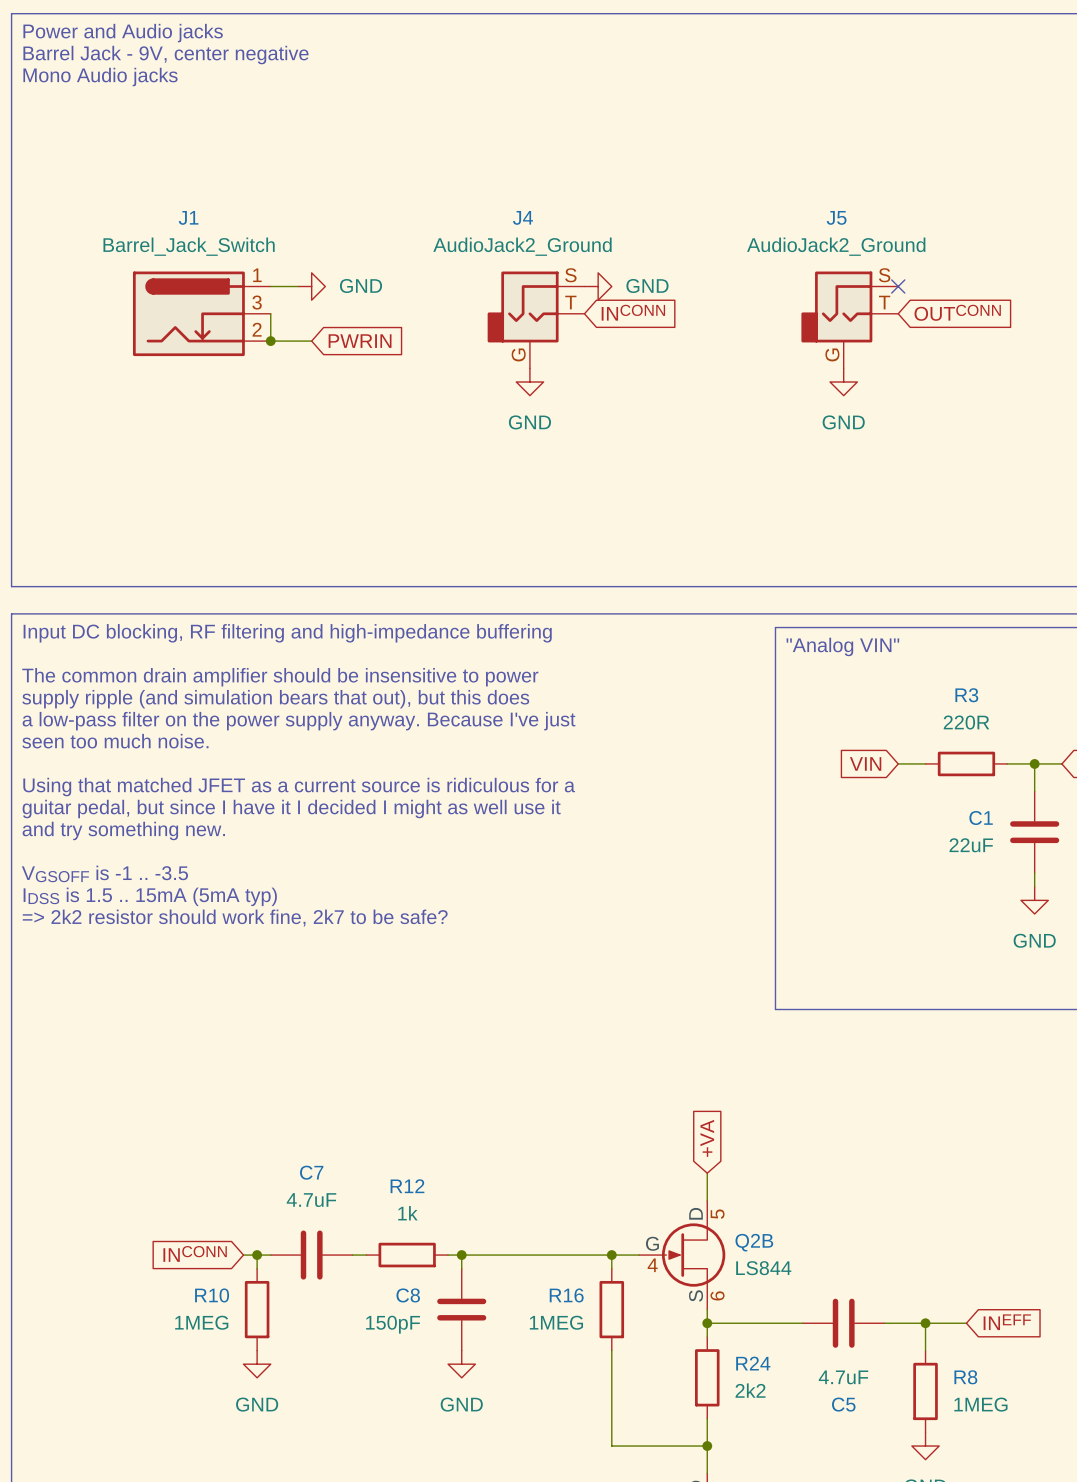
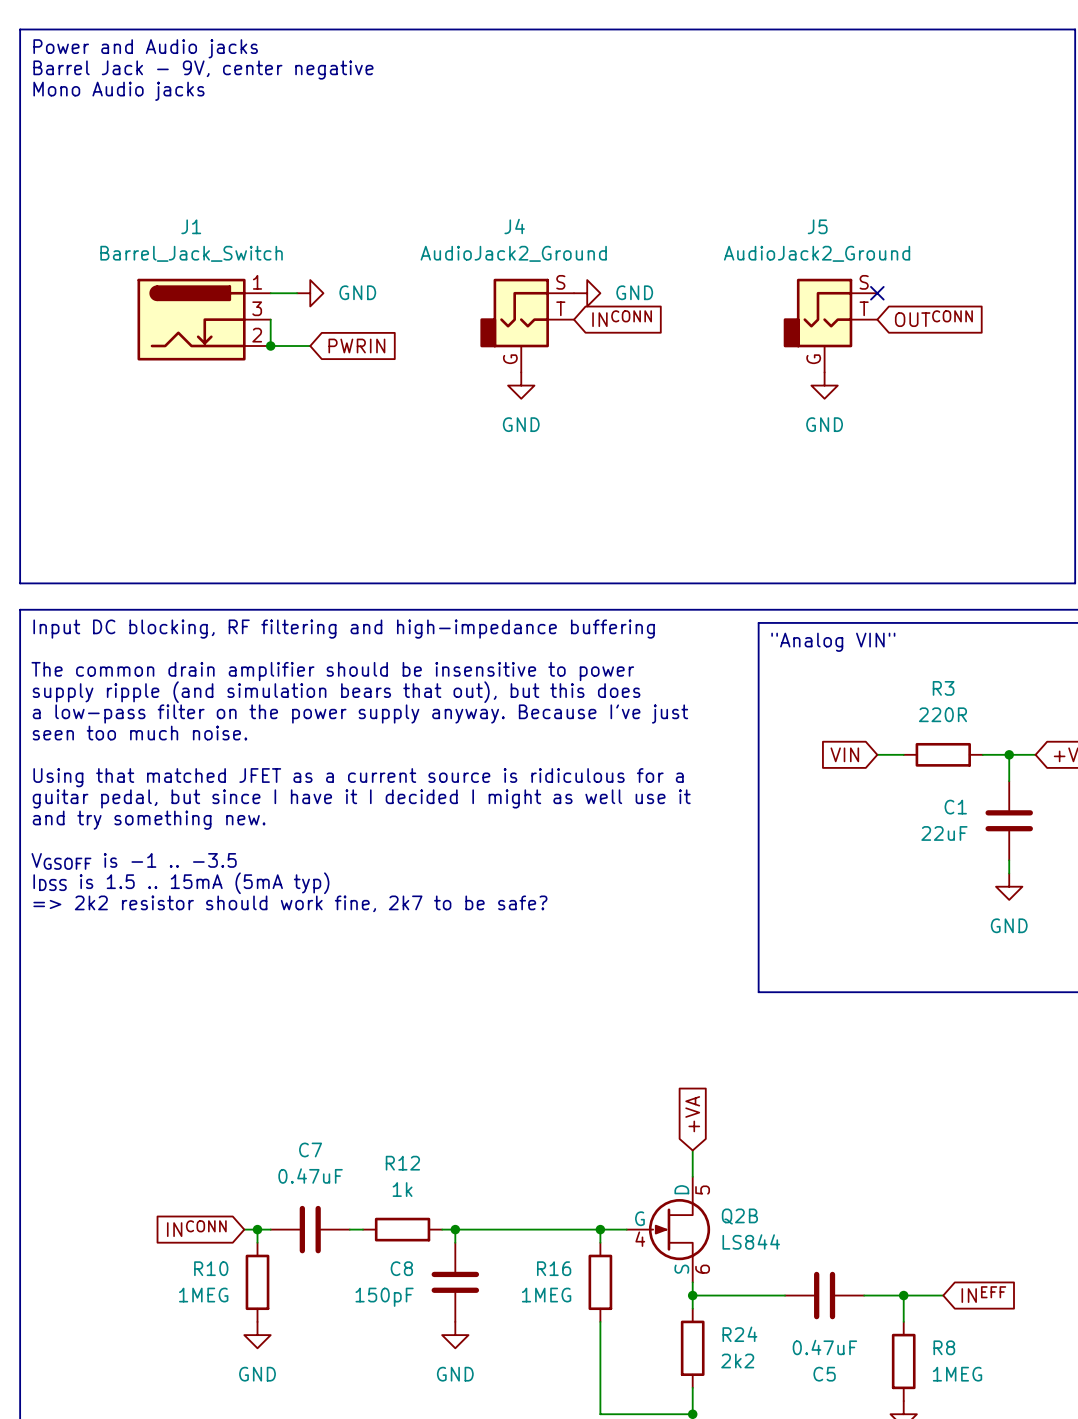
C7 value: 4.7uF (311, 1200) -> 0.47uF (310, 1176)
C5 value: 4.7uF (843, 1377) -> 0.47uF (824, 1347)

